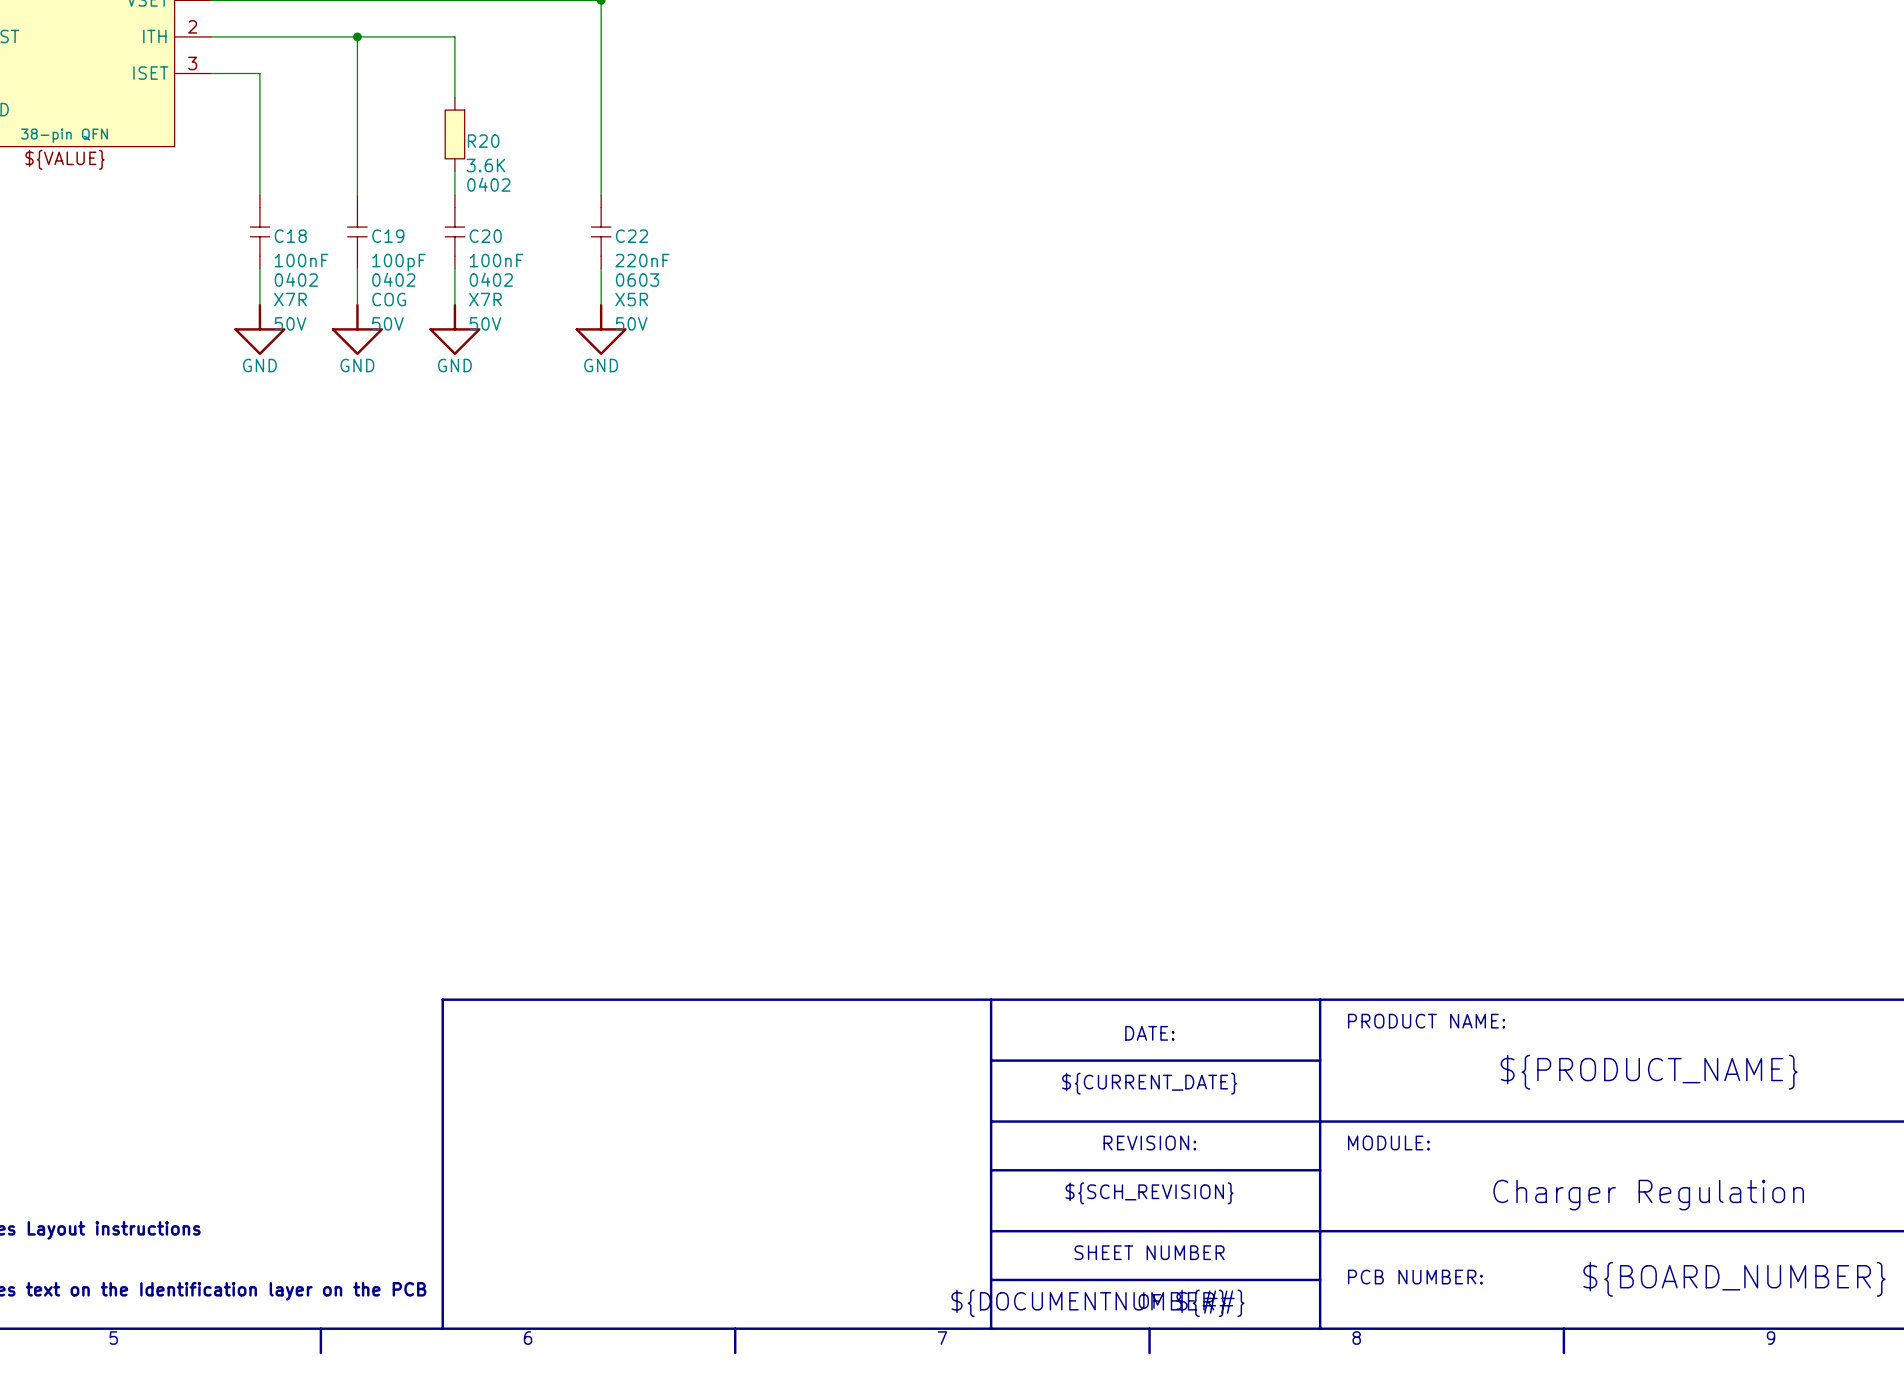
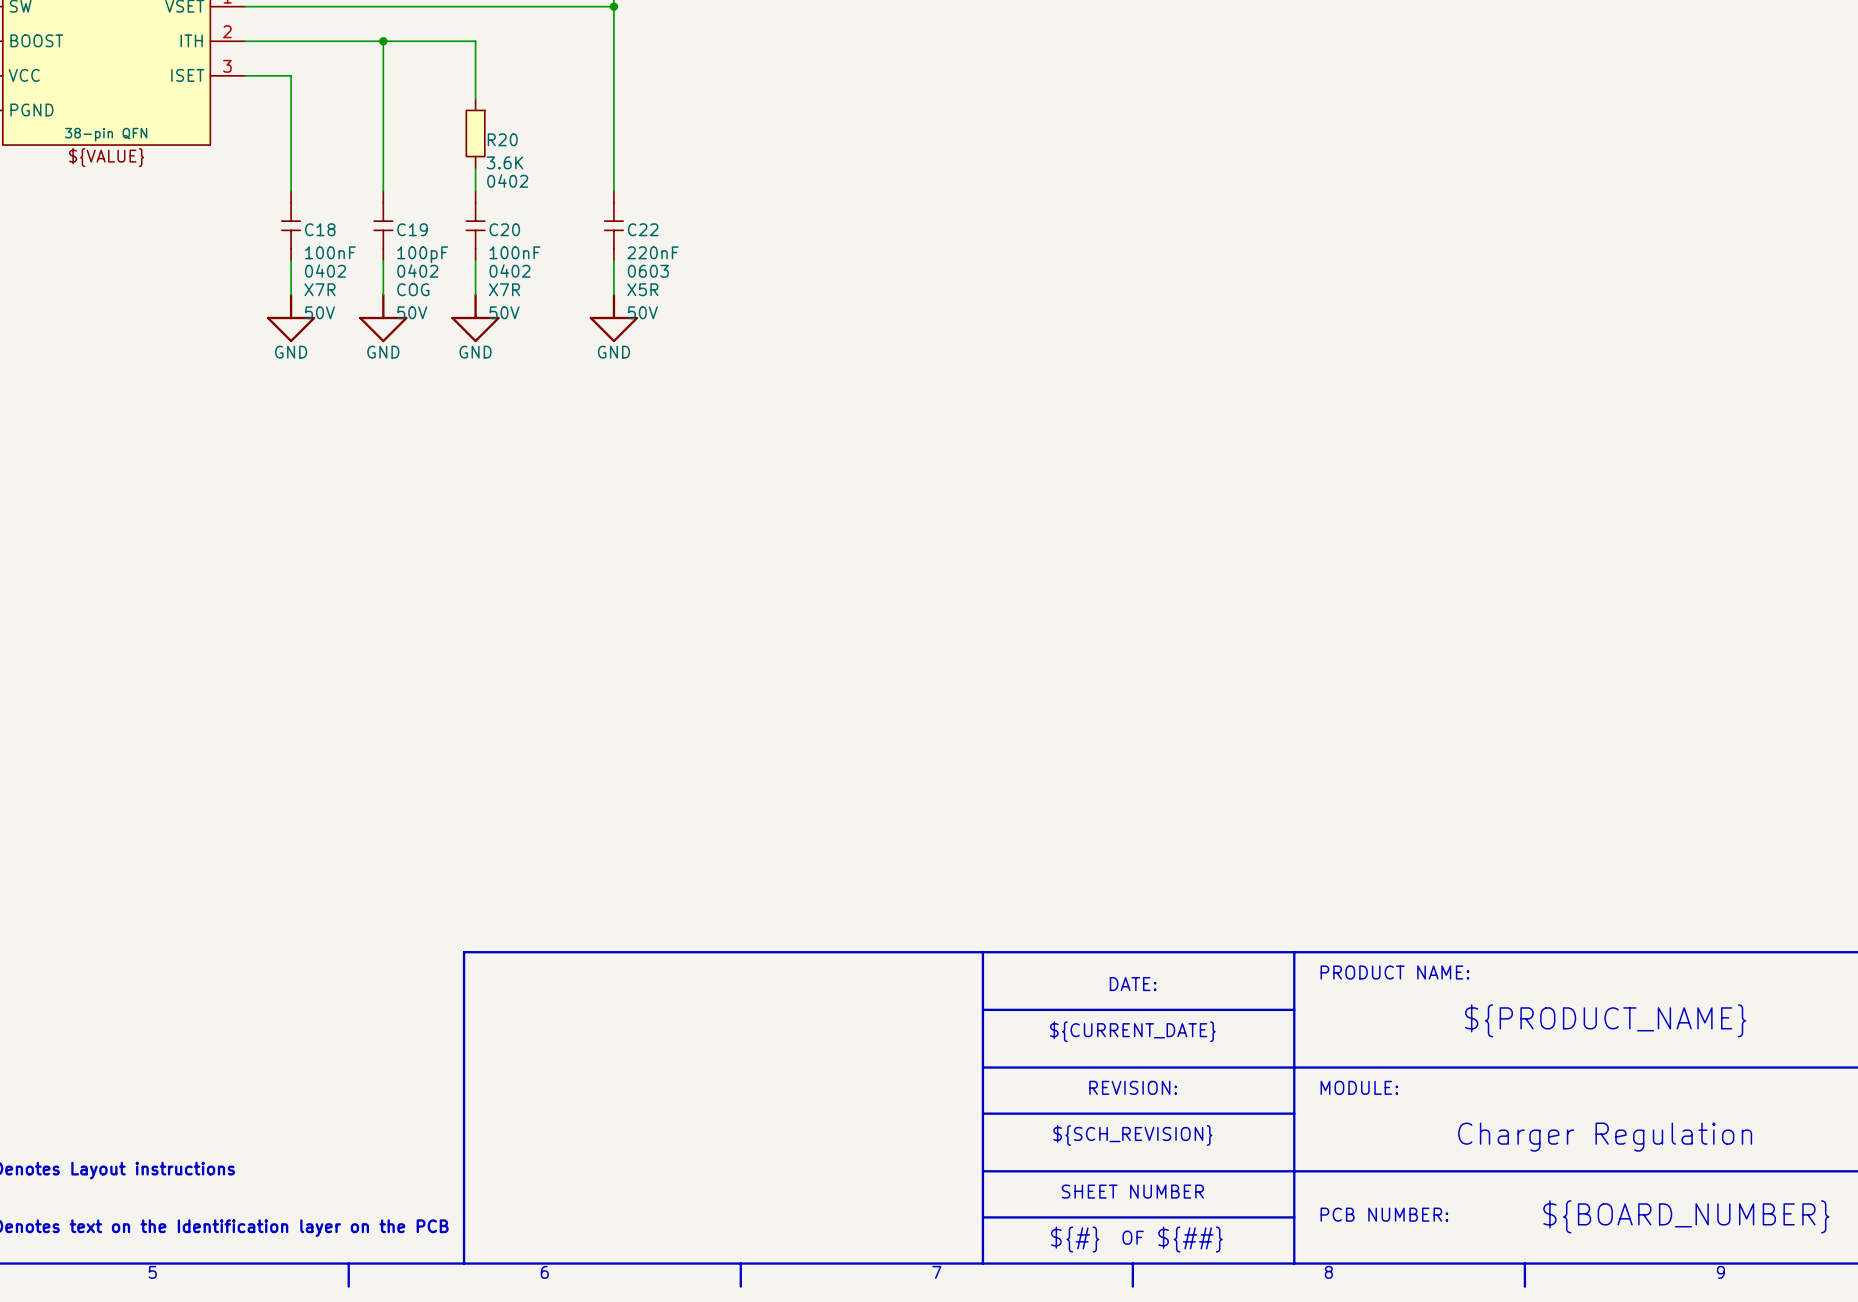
text: ${DOCUMENTNUMBER} (1088, 1303) -> ${#} (1075, 1239)

